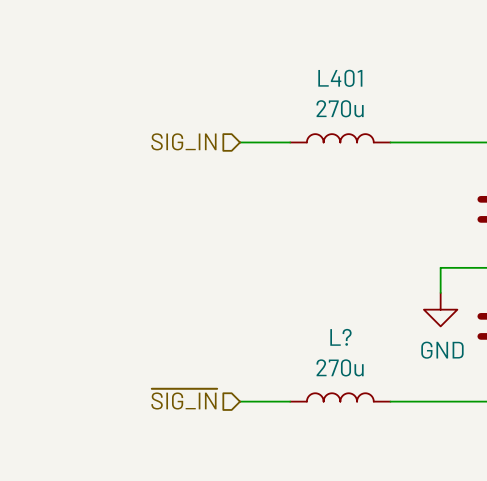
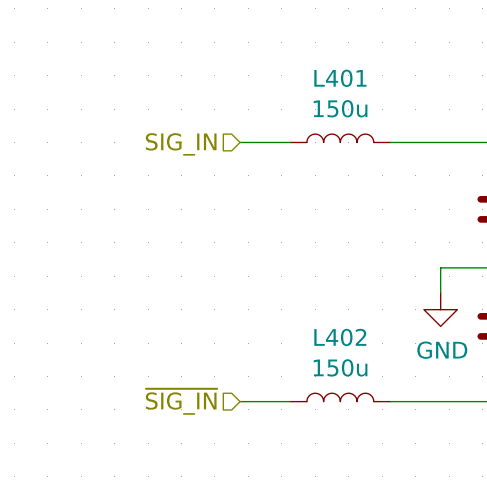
L401 value: 270u (340, 108) -> 150u (340, 108)
L? name: L? (340, 337) -> L402 (340, 337)
L? value: 270u (340, 367) -> 150u (340, 367)

